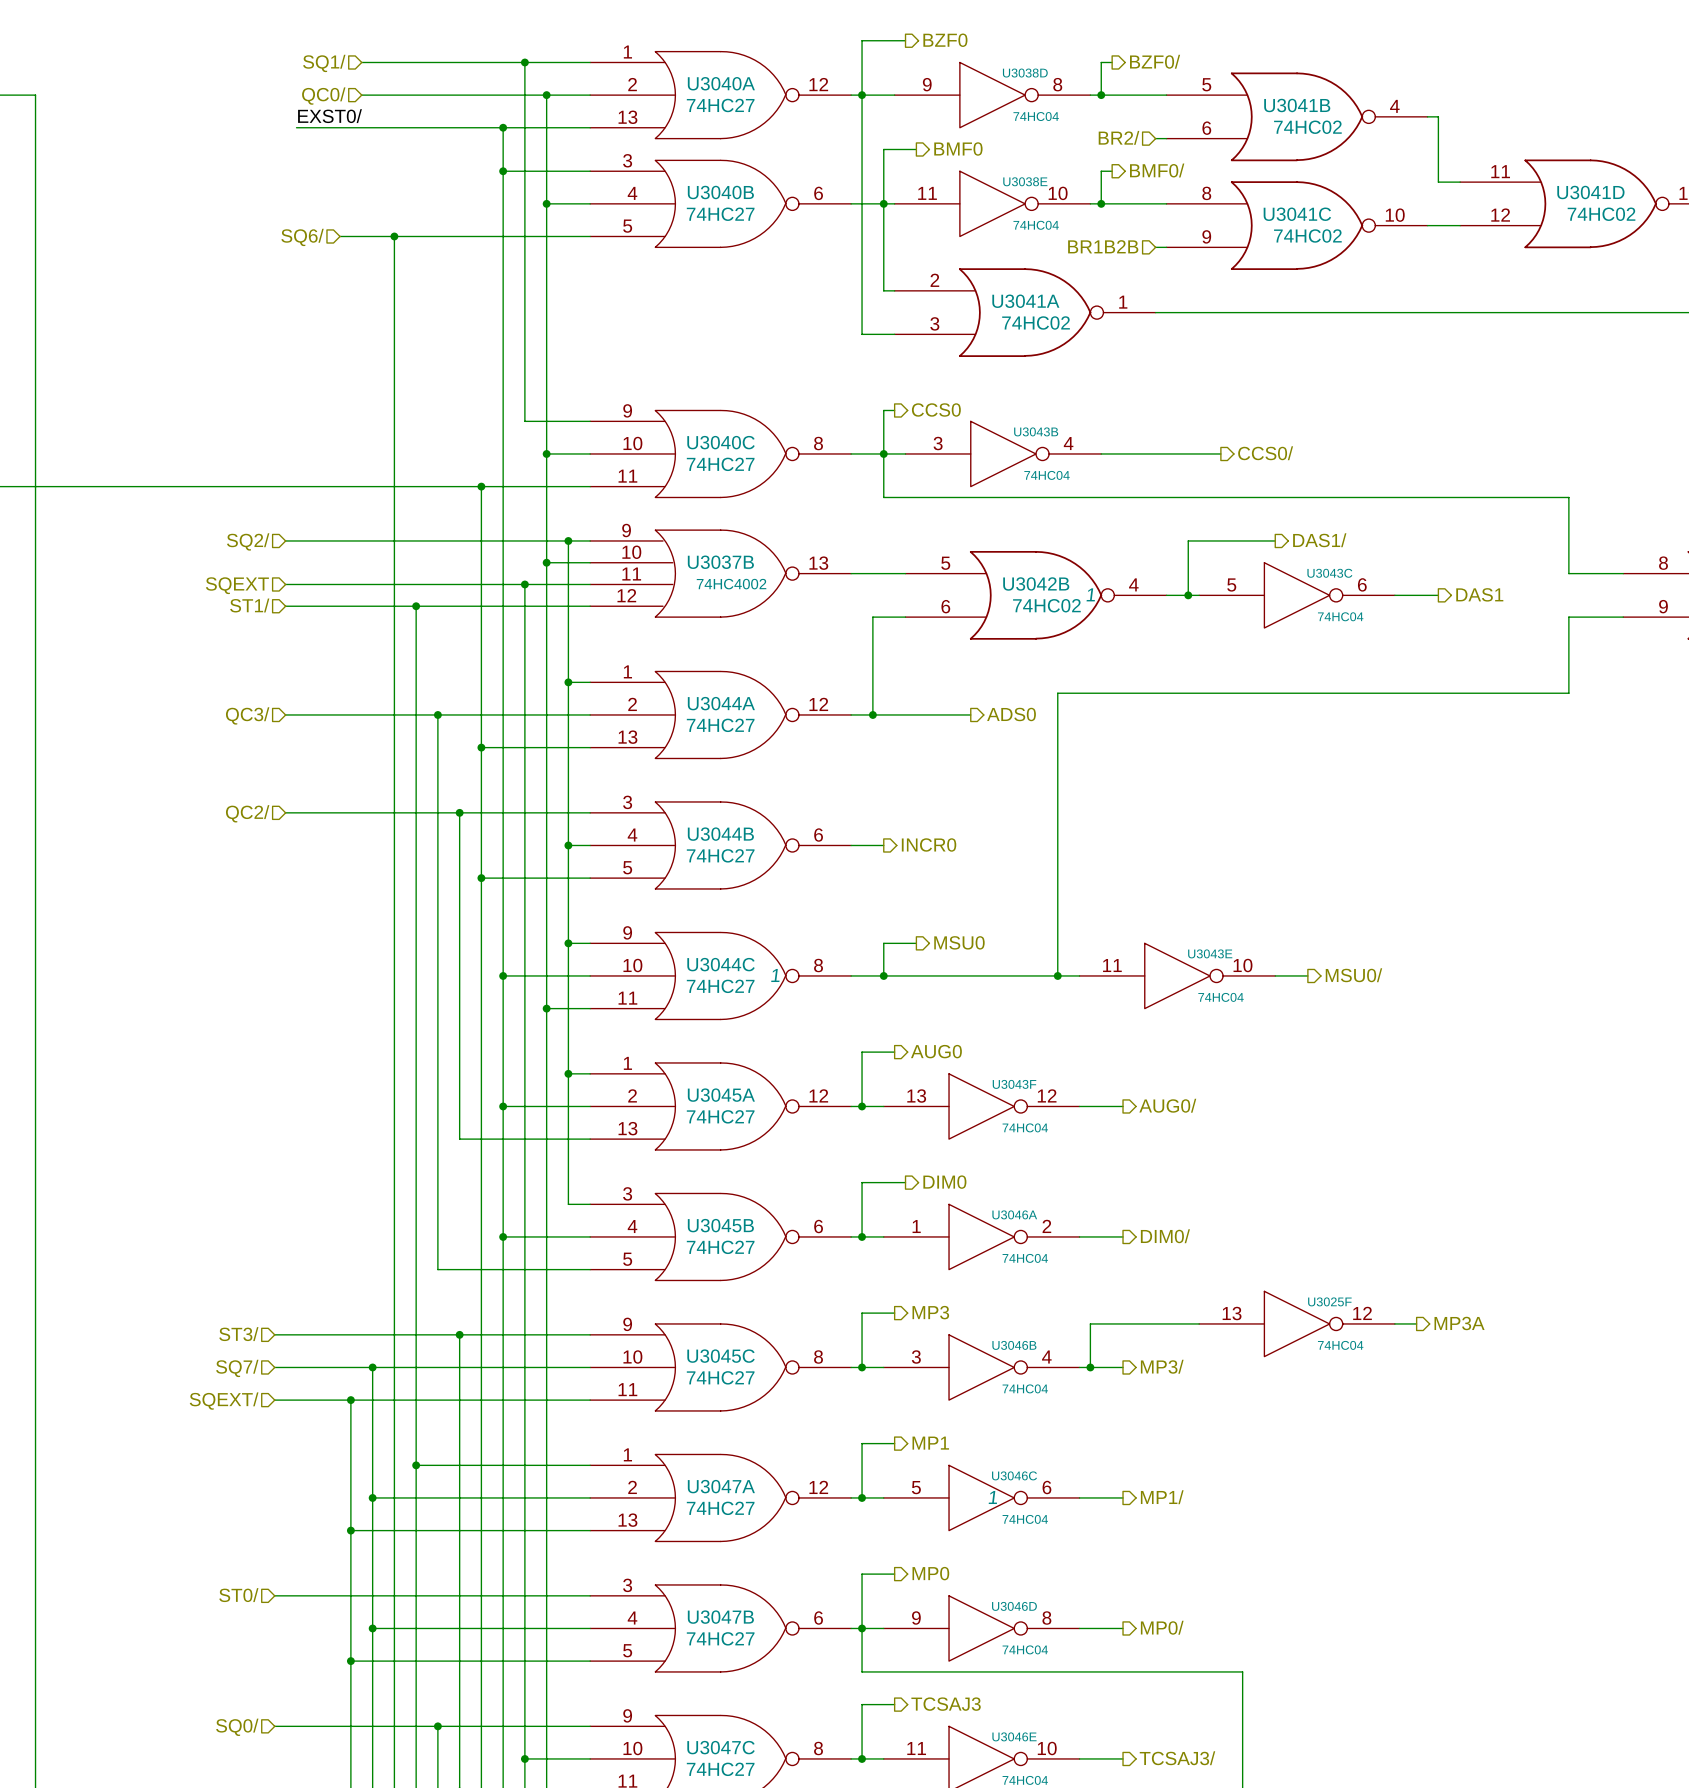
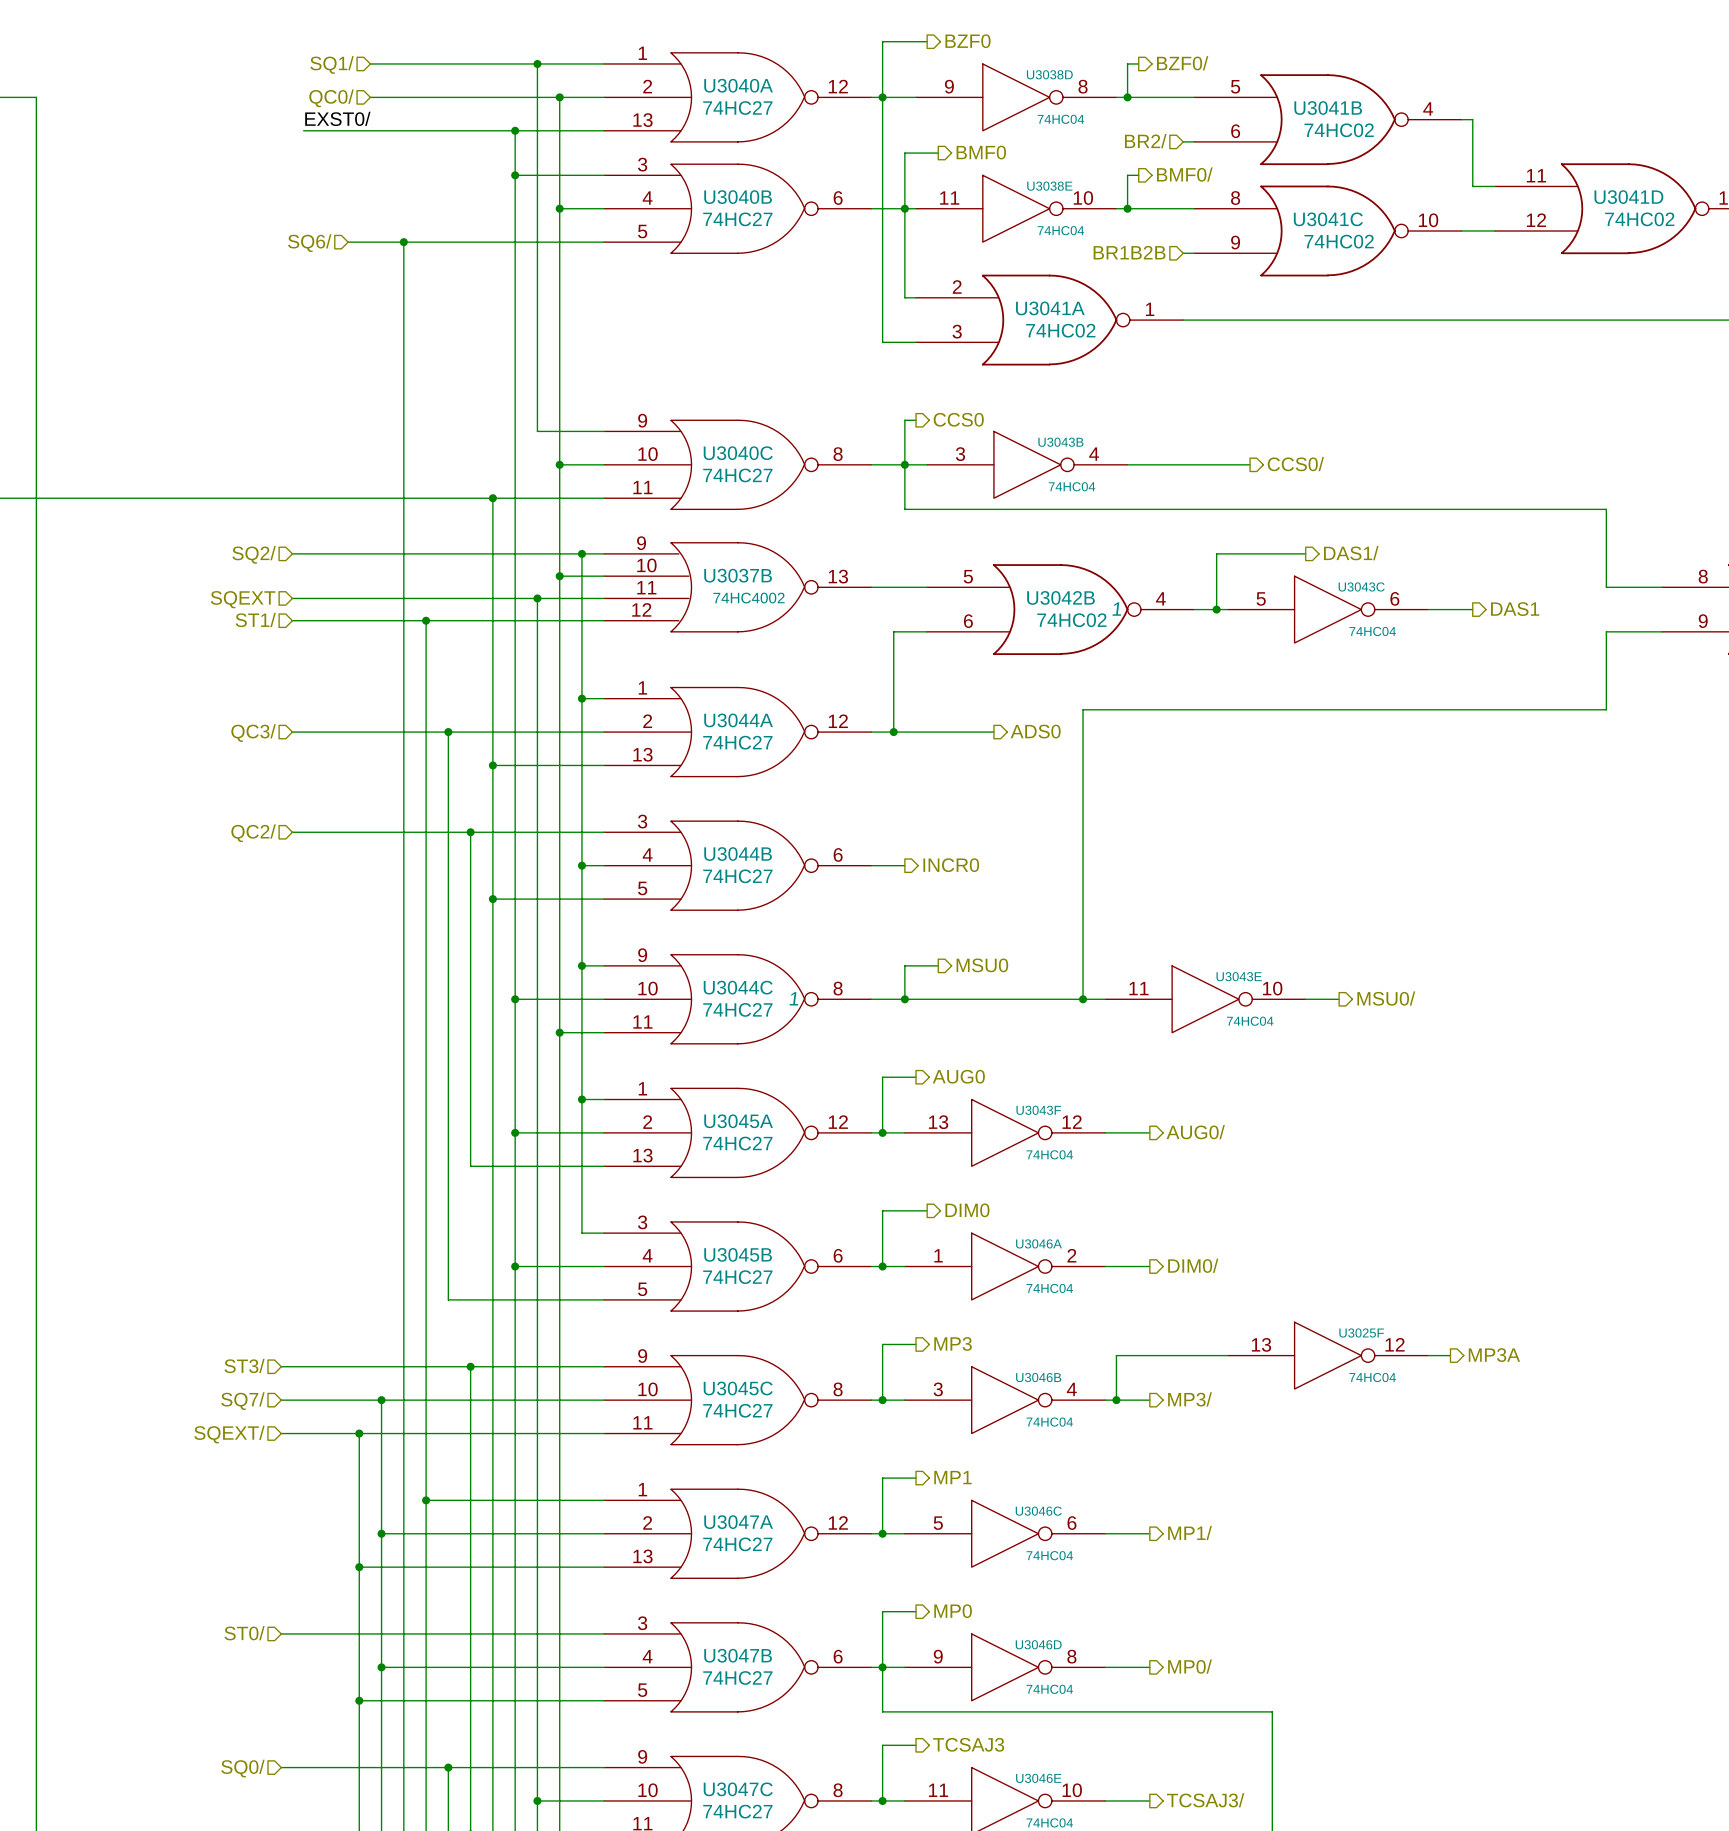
U3046C text: 1 (992, 1497) -> none

